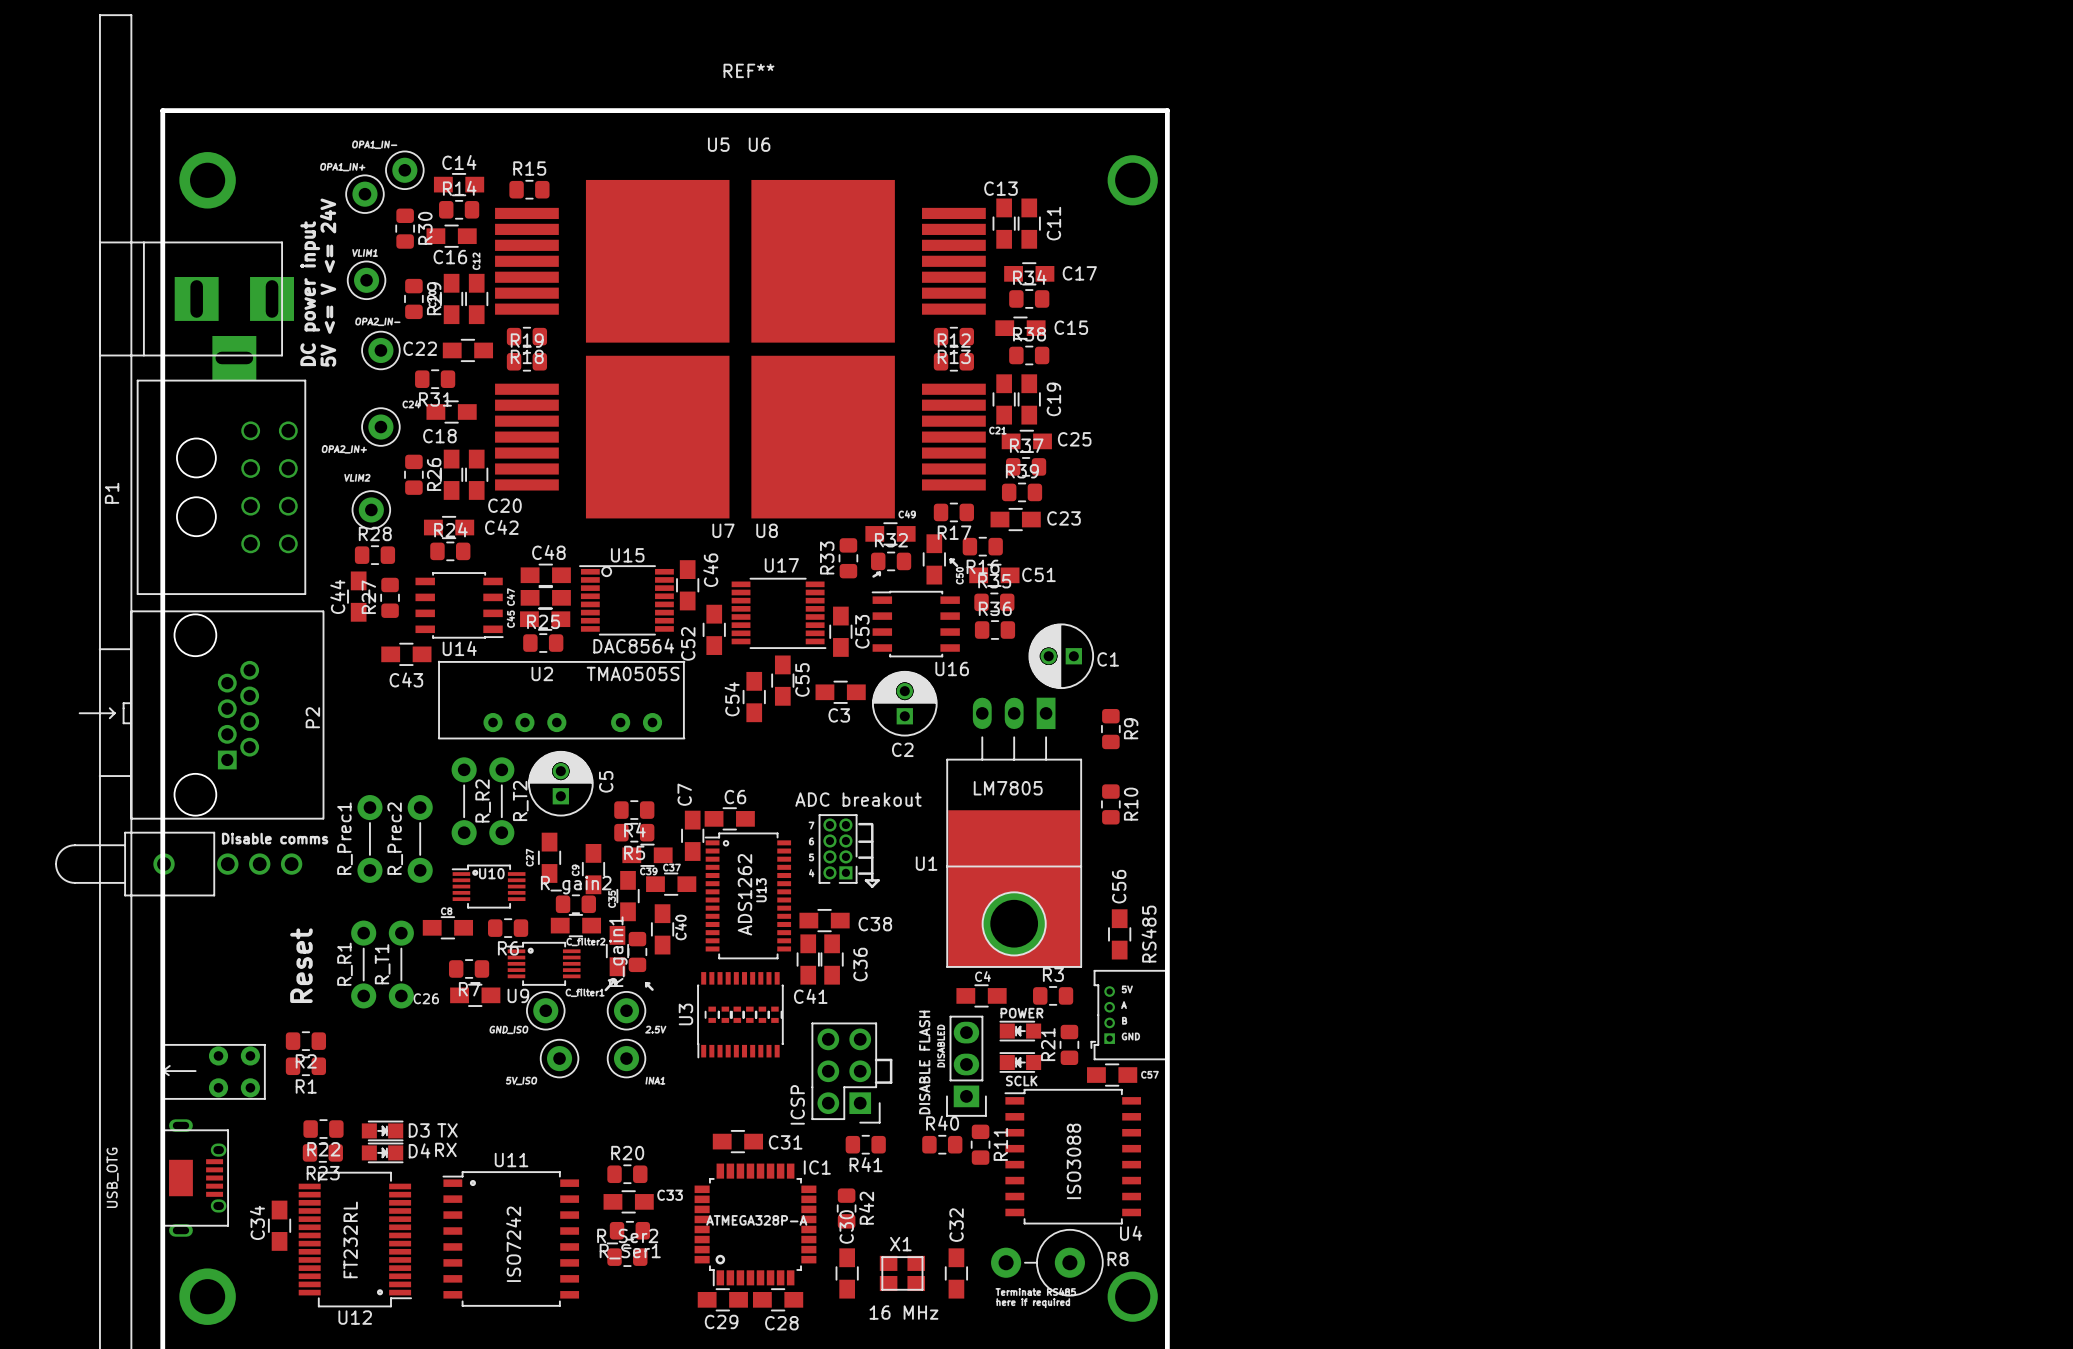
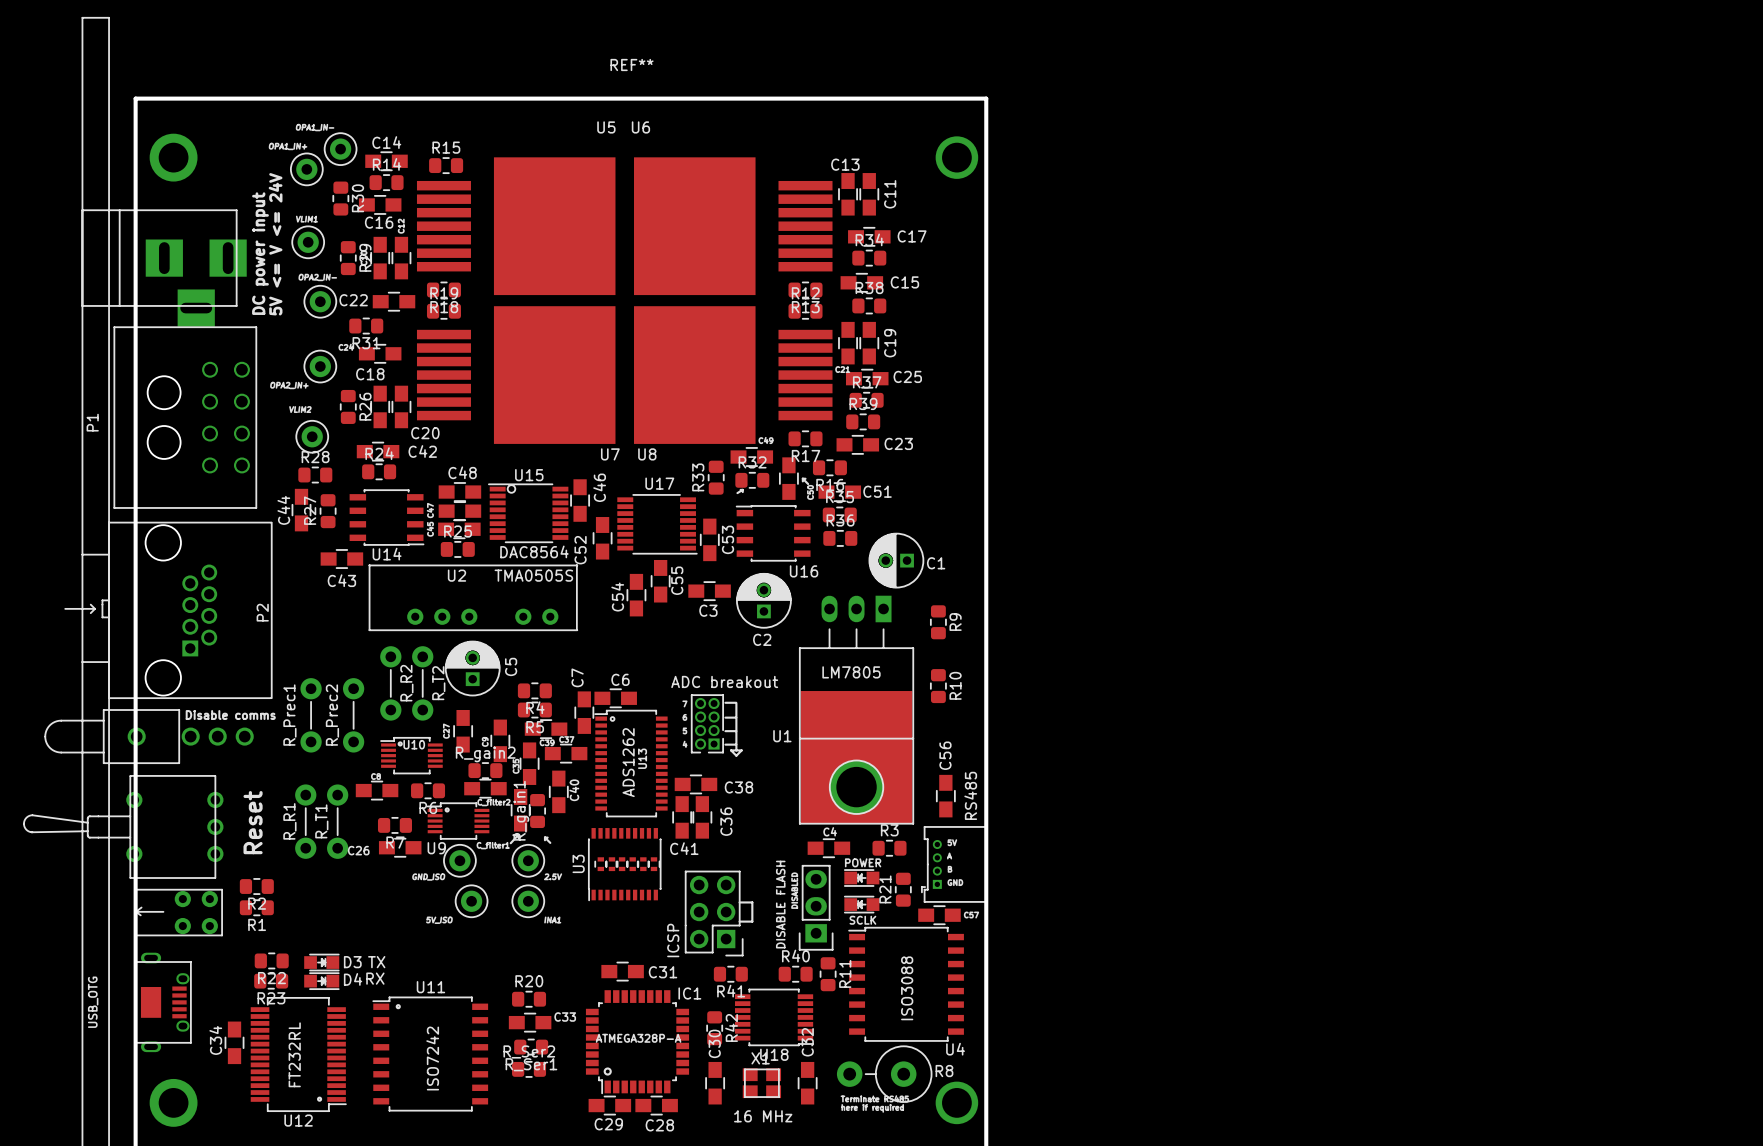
part: none -> (123, 826)
U18: none -> (774, 1017)

